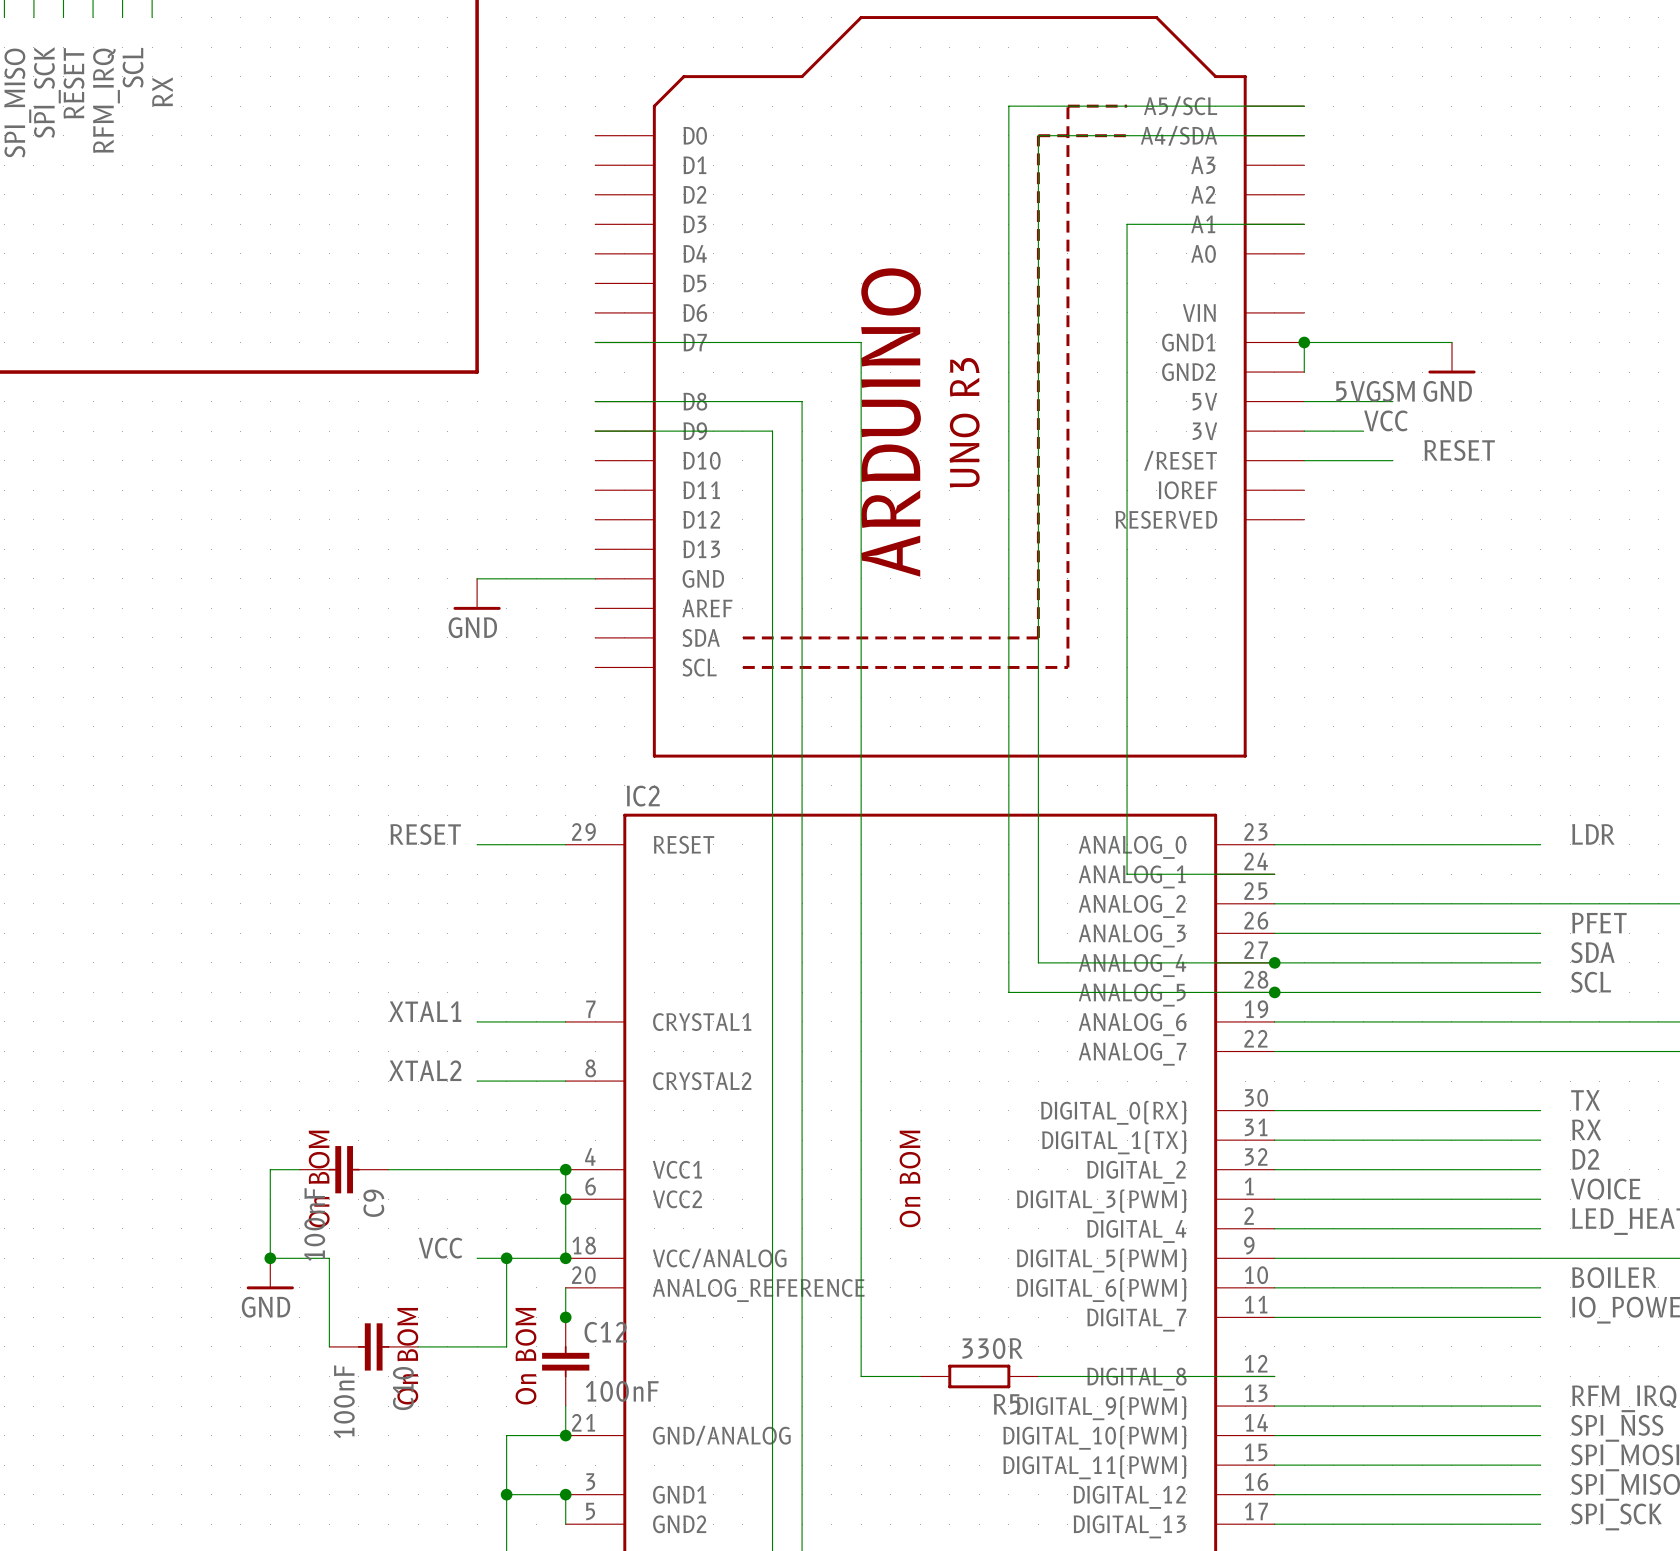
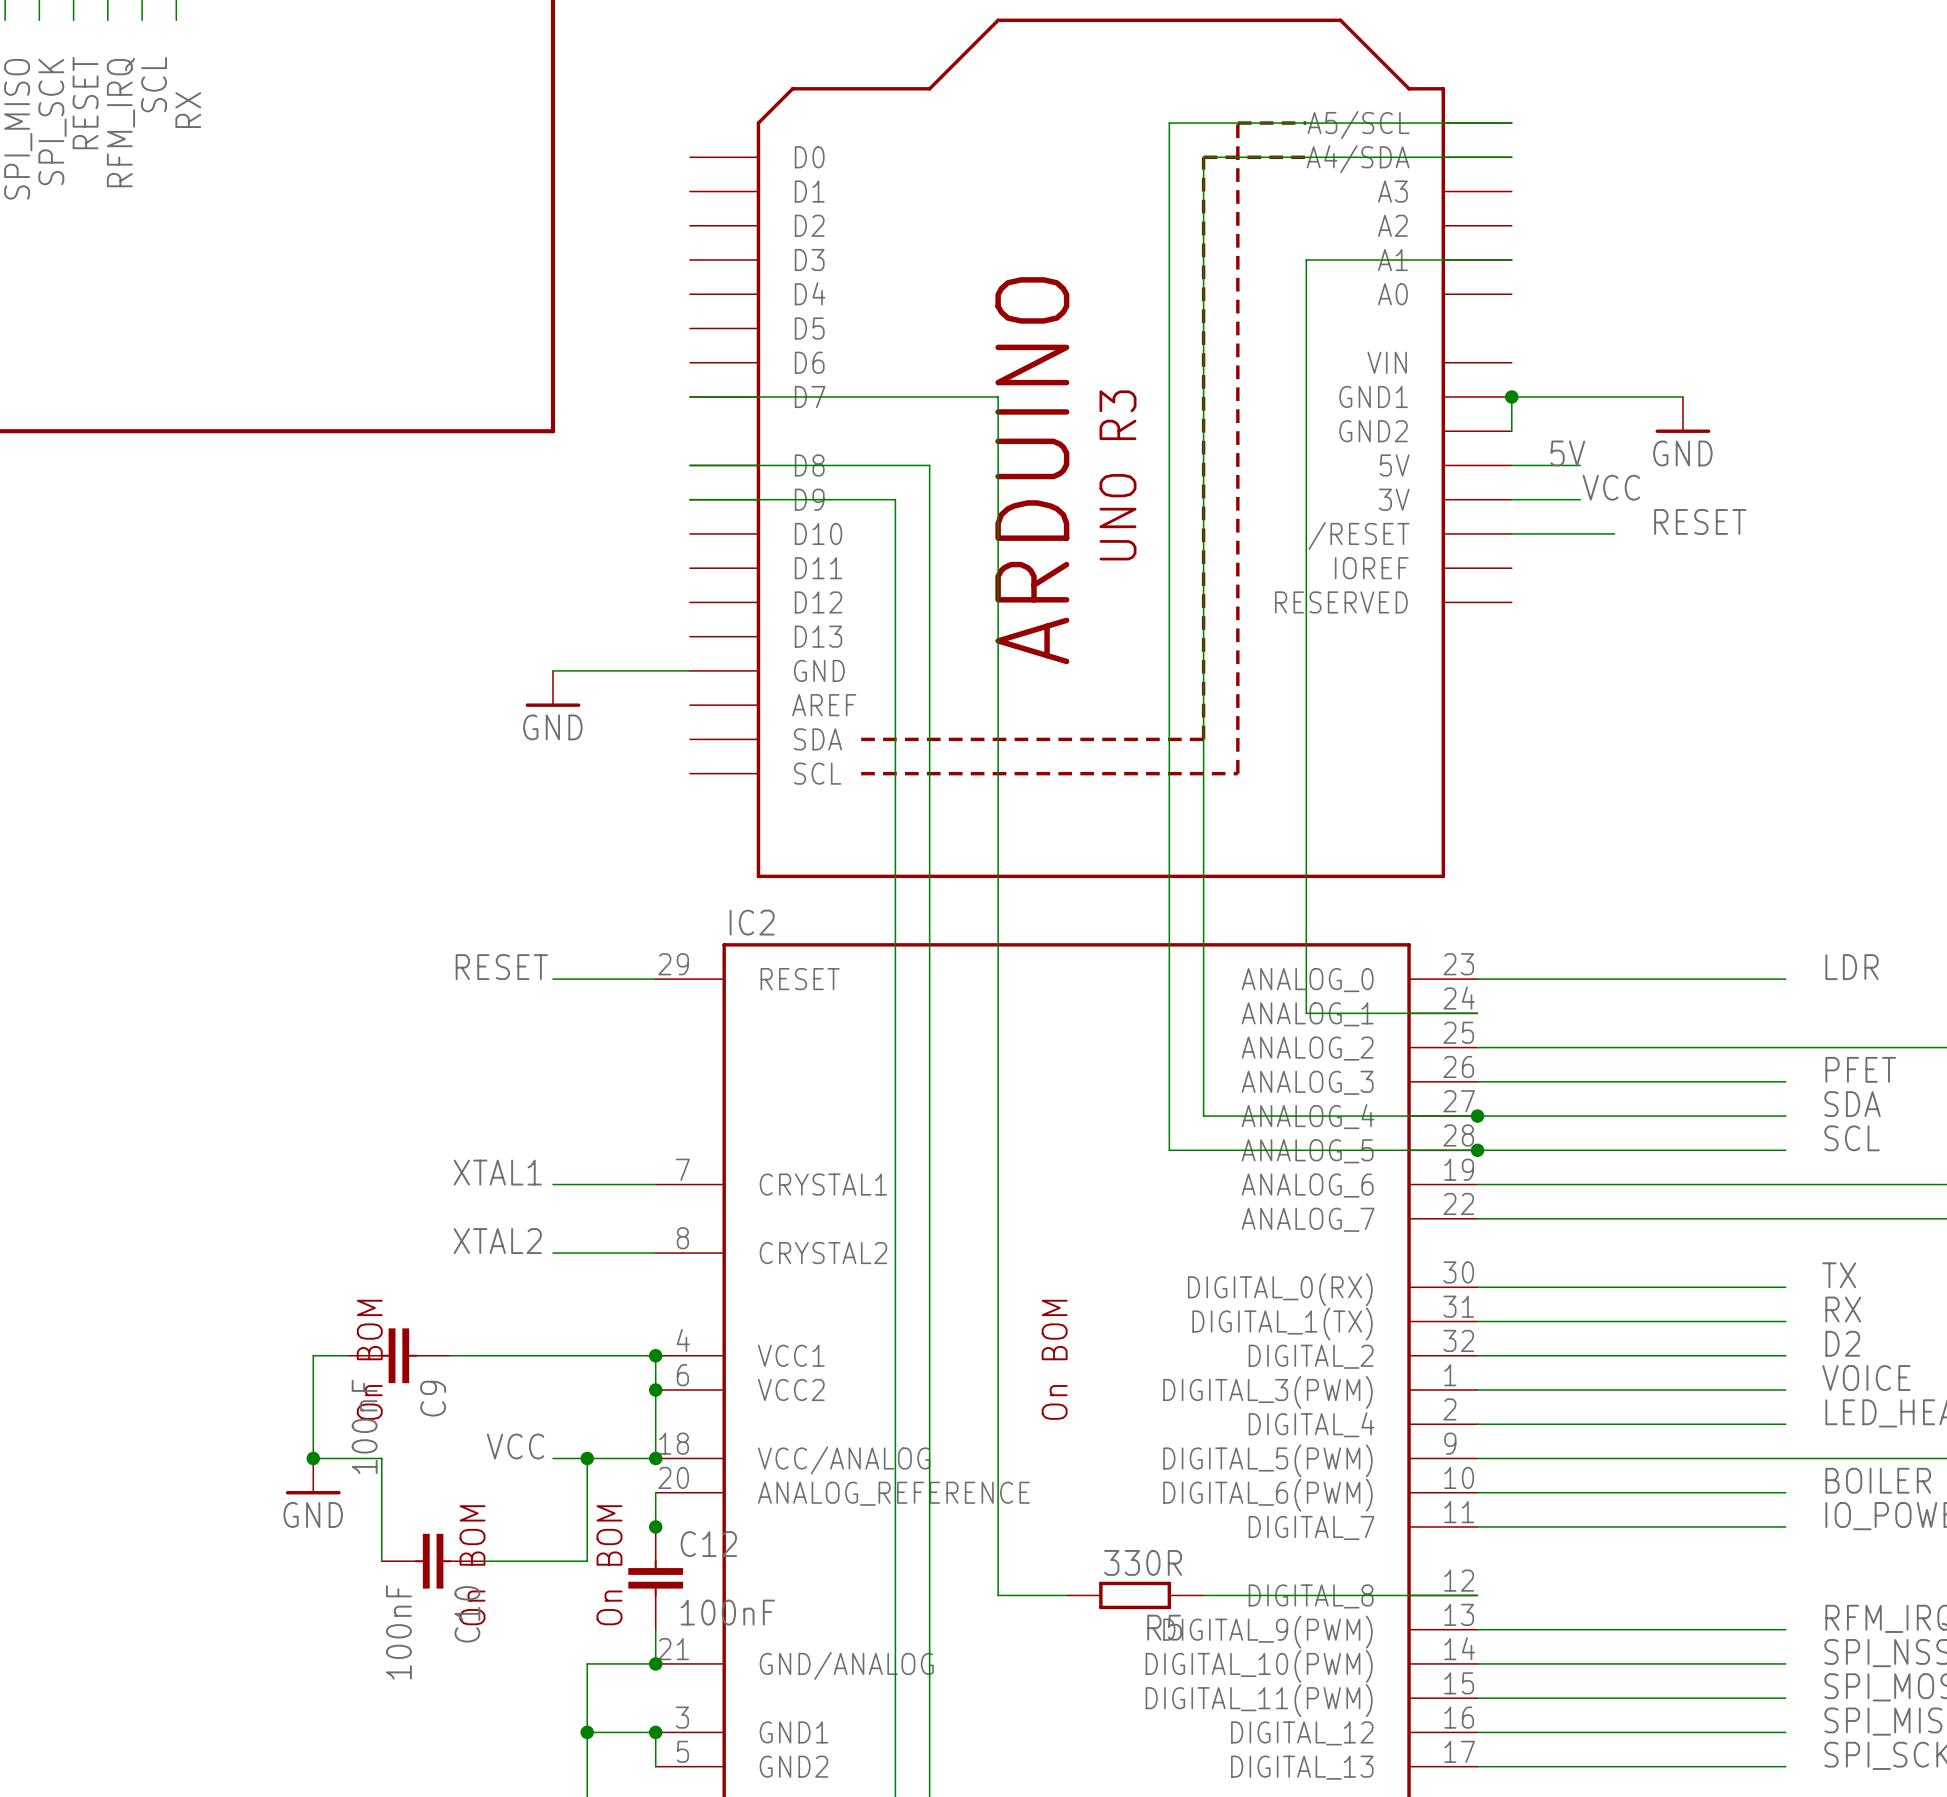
label: 5VGSM (1375, 391) -> 5V (1567, 453)
wire: (1363, 401) (1392, 401) -> none

